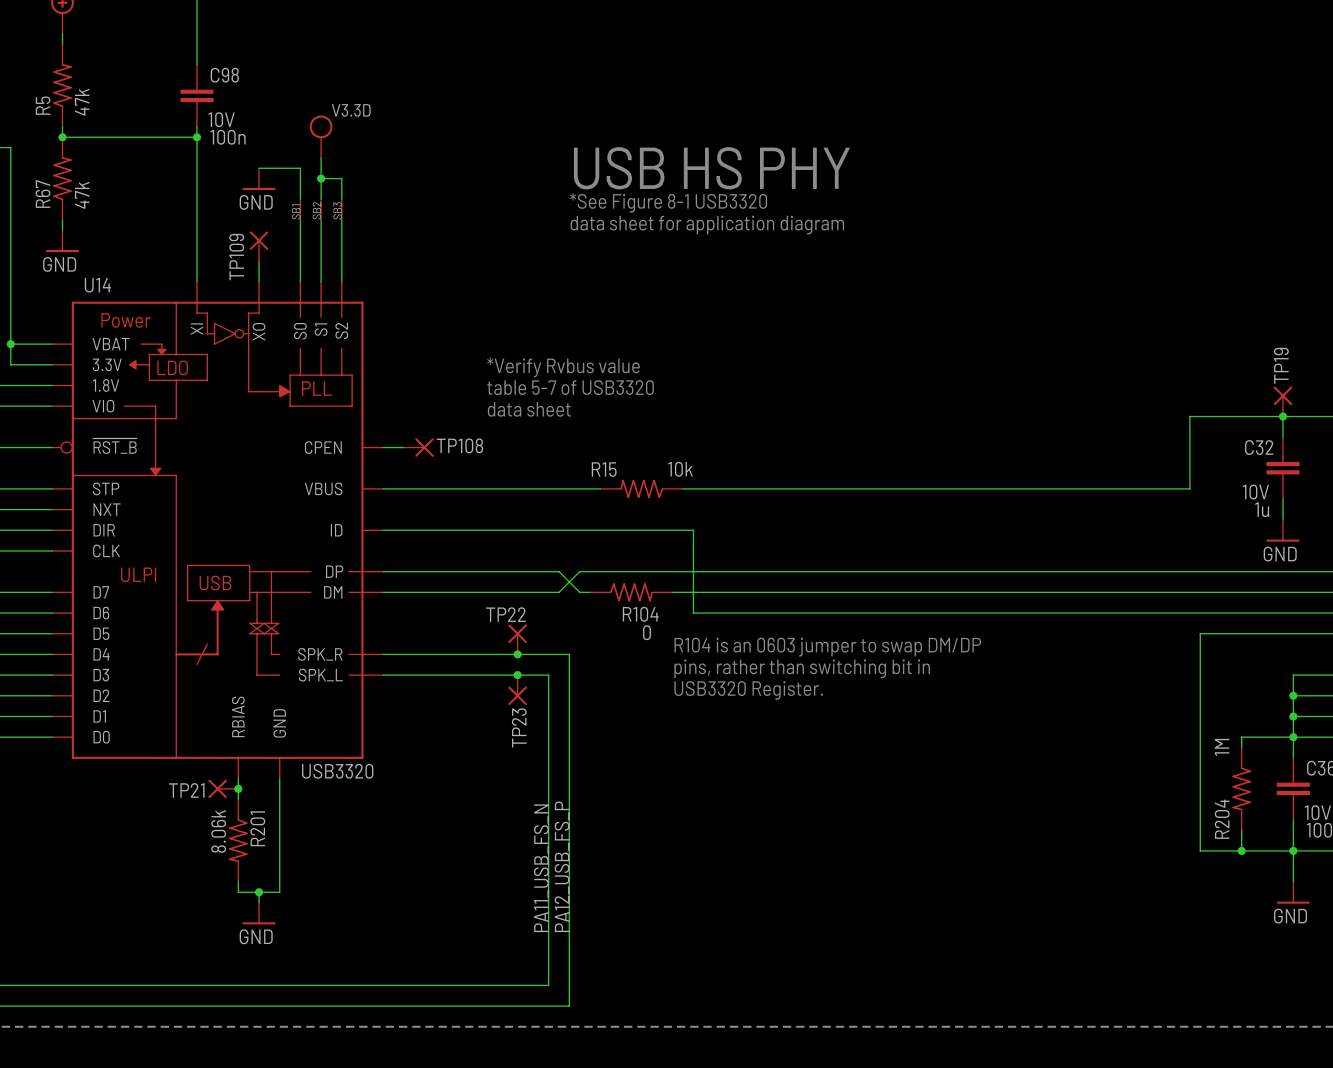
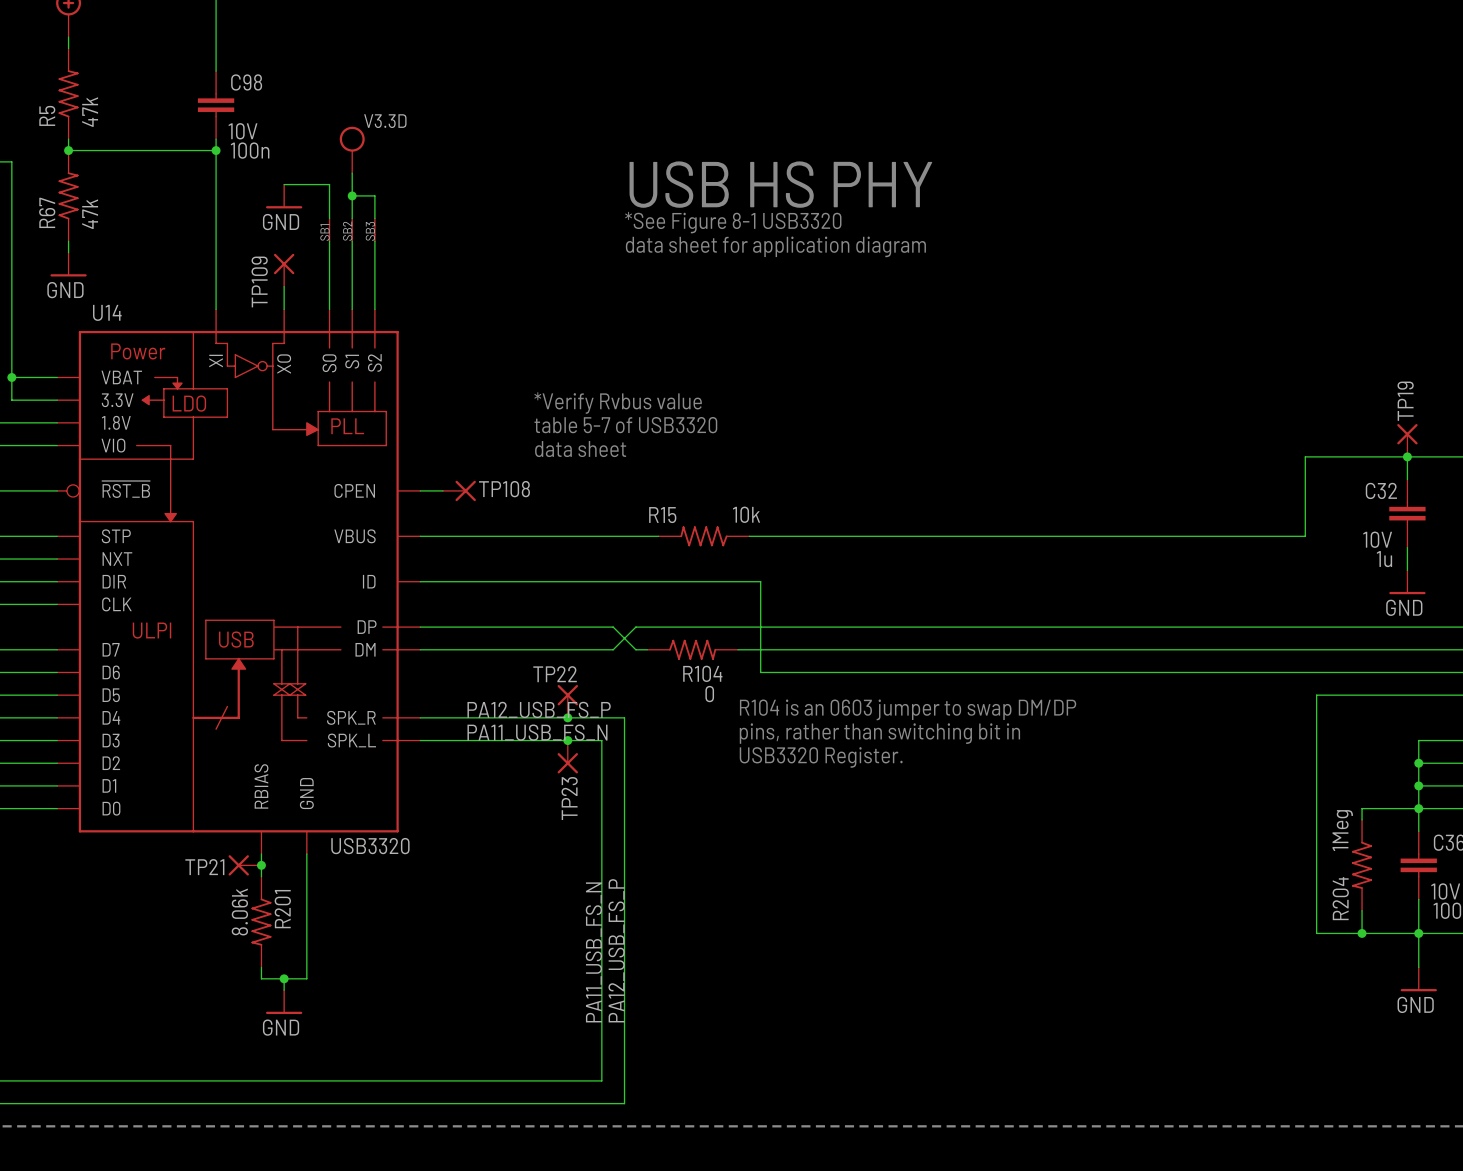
label: none -> PA12_USB_FS_P (539, 709)
label: none -> PA11_USB_FS_N (537, 732)
R204 value: 1M (1222, 747) -> 1Meg (1342, 830)

